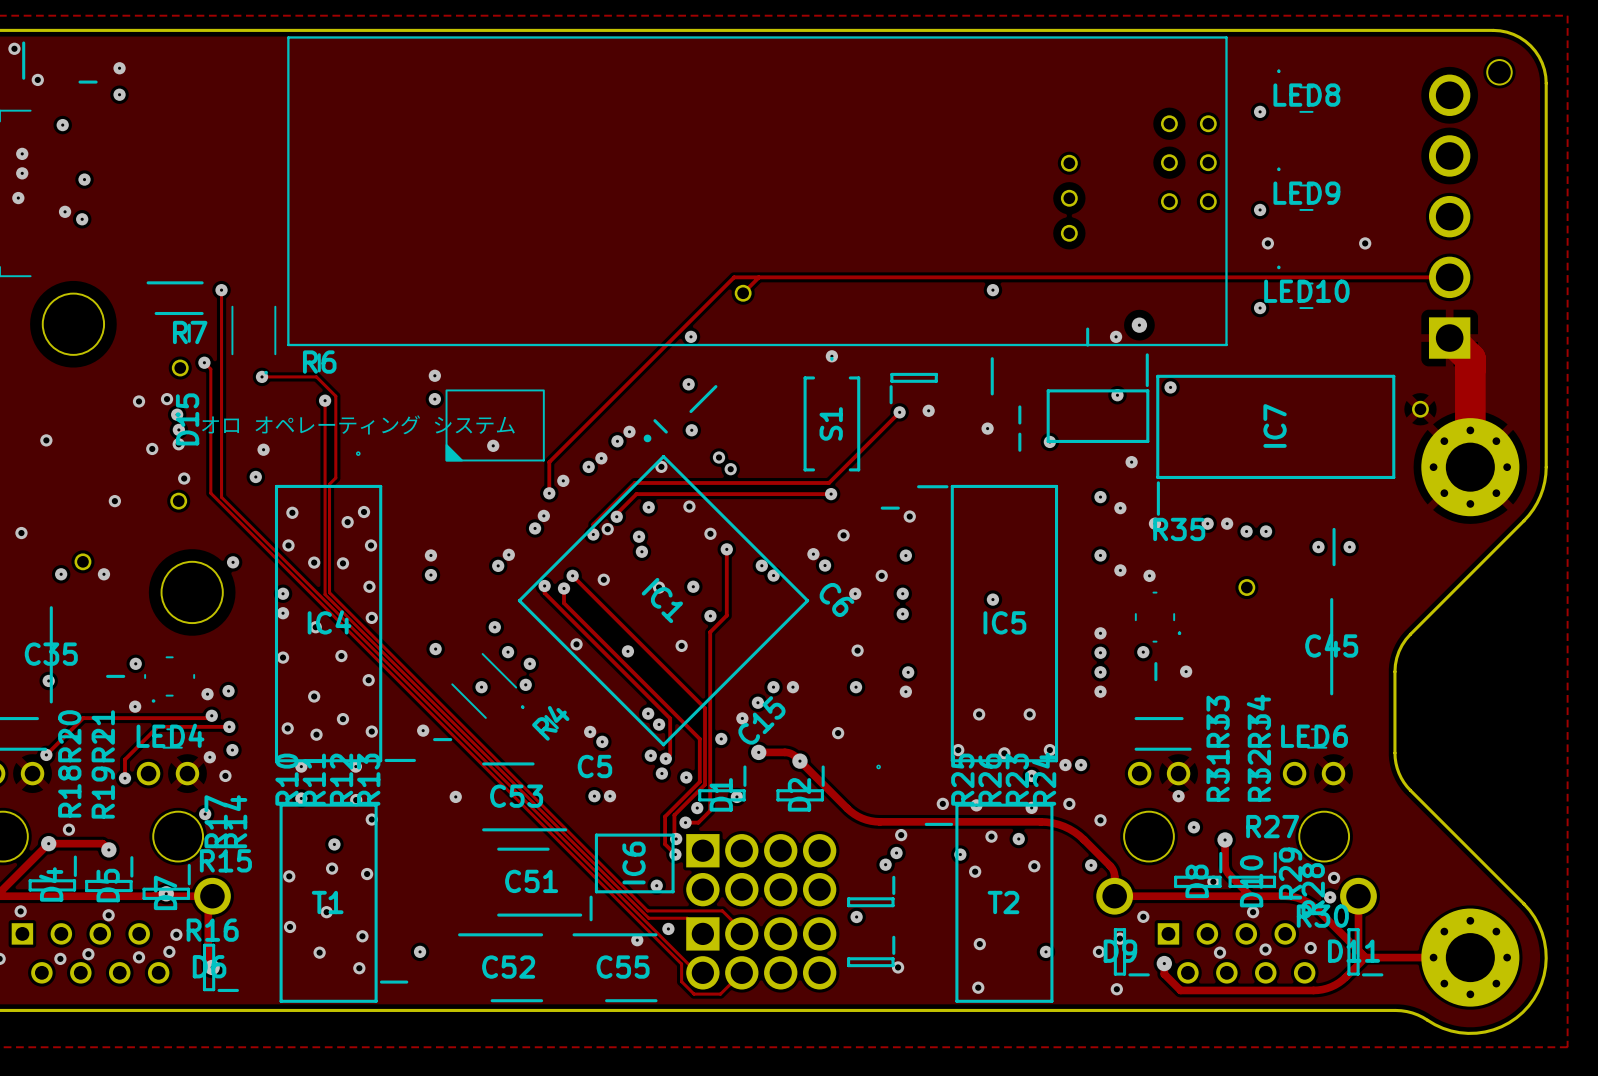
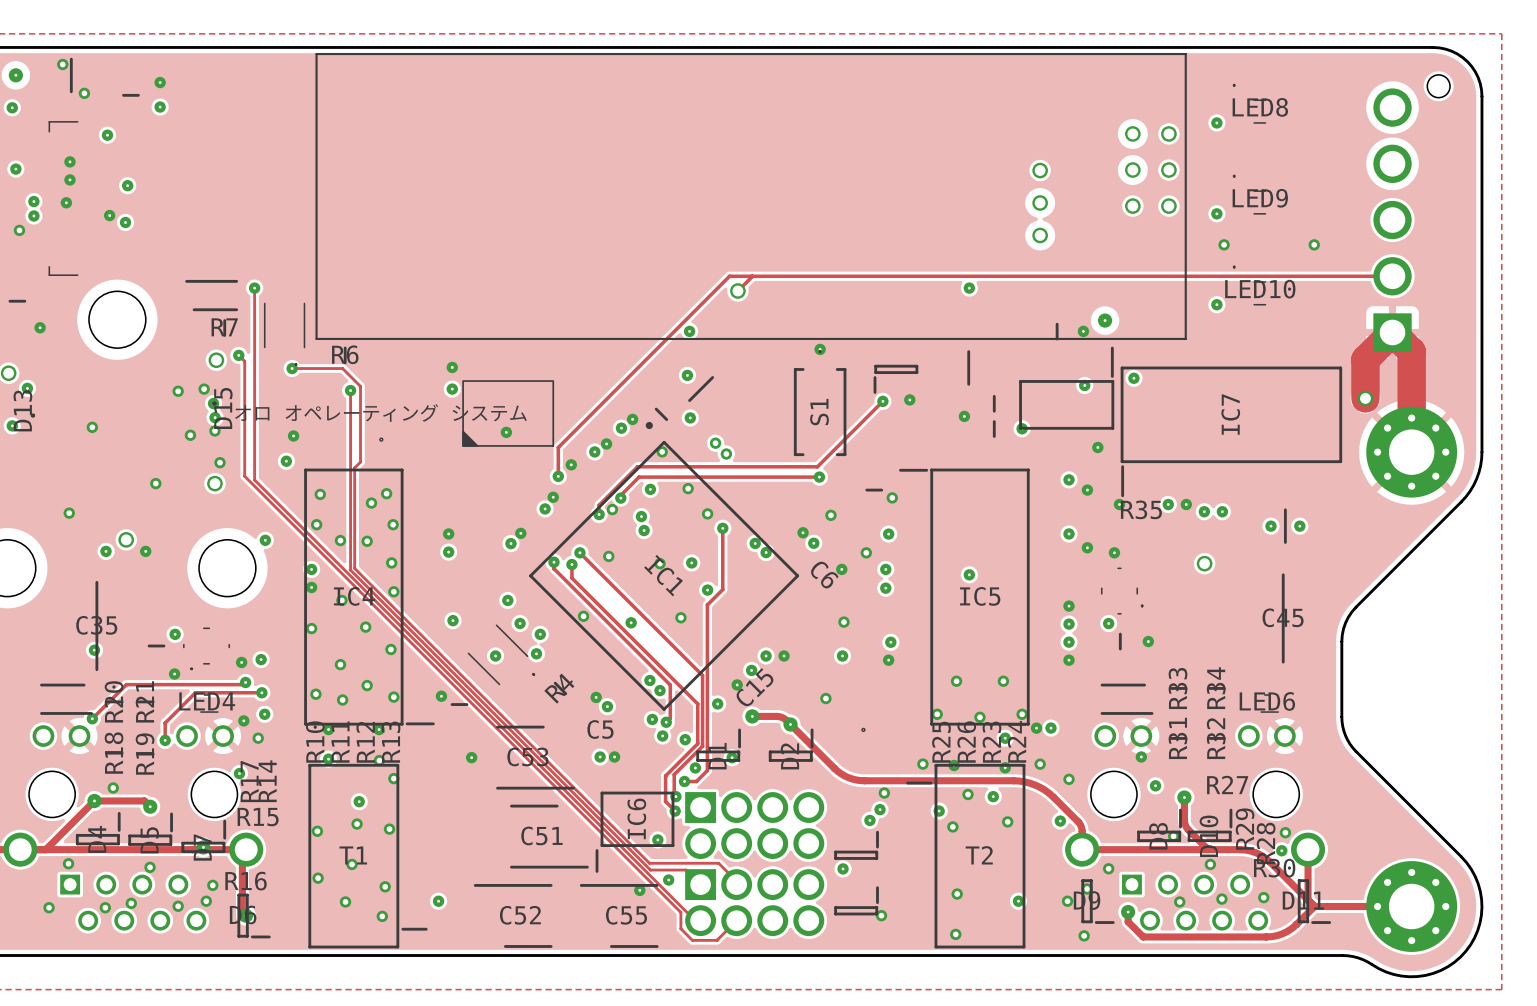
track: none -> (1392, 332) (1365, 359) (1365, 398)

